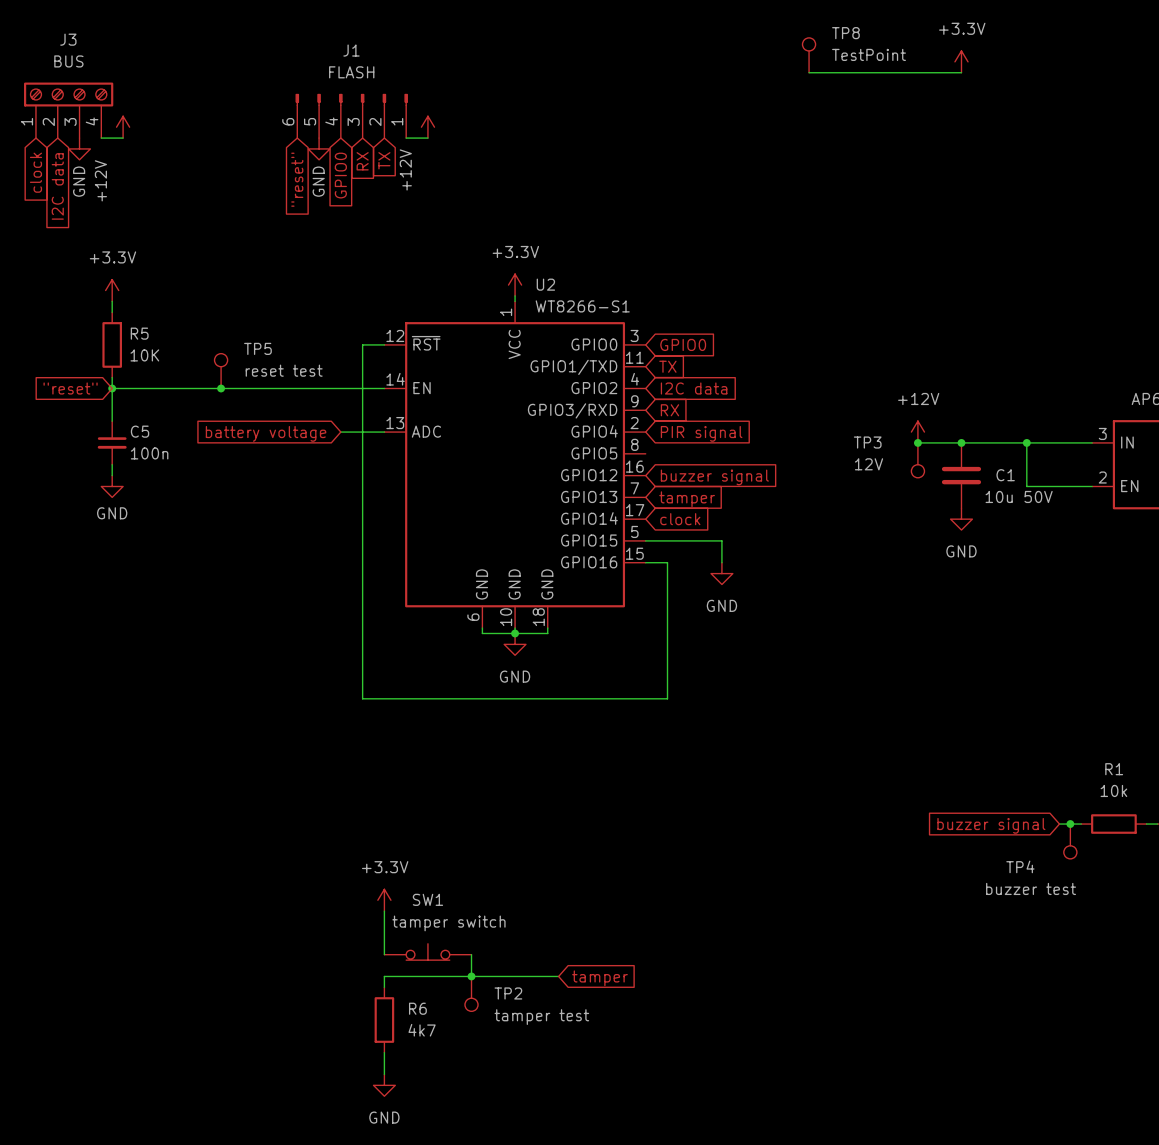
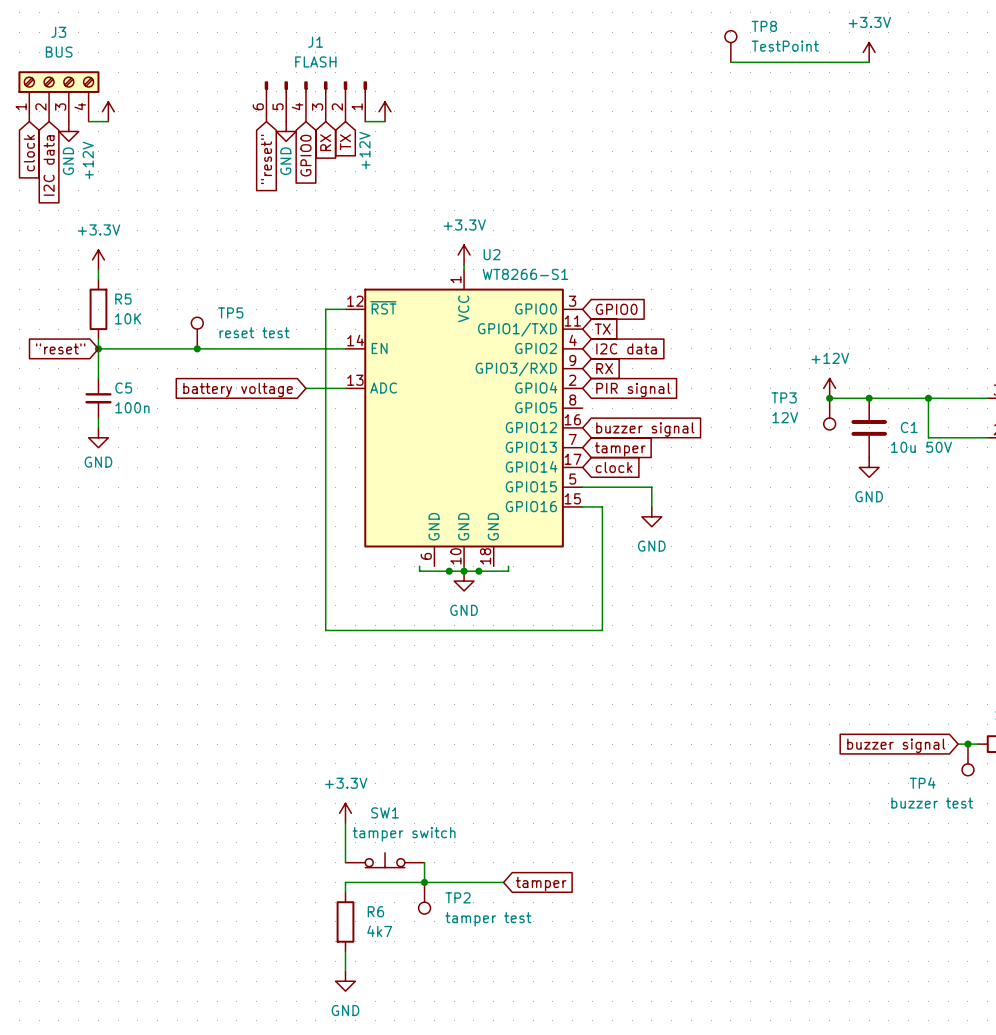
wire: (482, 628) (482, 633) -> (419, 566) (419, 571) (434, 571)
wire: (547, 628) (547, 633) -> (508, 566) (508, 571) (493, 571)
junction: none -> (449, 571)
junction: none -> (478, 571)

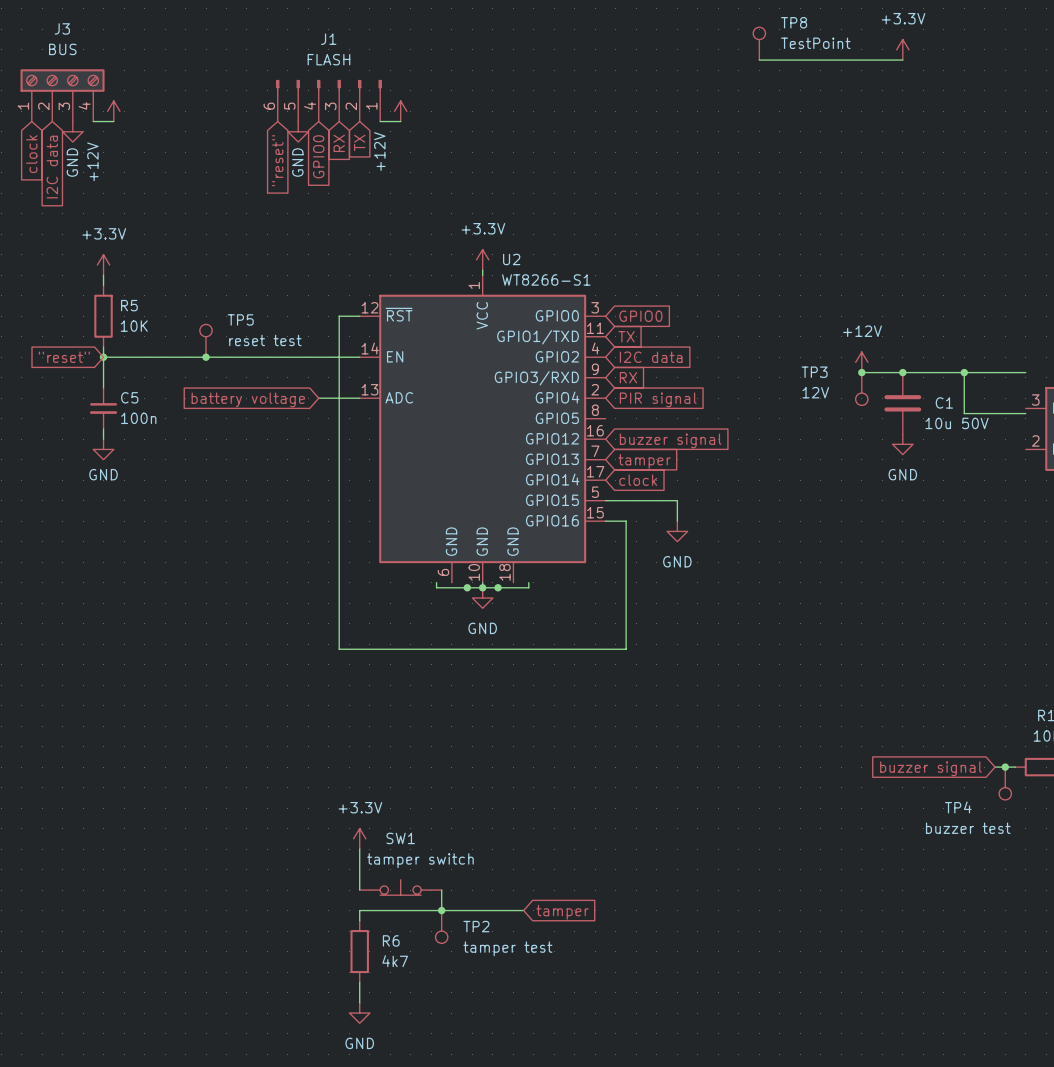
junction: none -> (861, 372)
junction: none -> (902, 372)
wire: none -> (964, 372) (964, 408)
junction: none -> (964, 372)
power symbol position: +12V (829, 388) -> +12V (861, 362)
wire: (829, 398) (987, 398) -> (861, 372) (1025, 372)
junction: (829, 398) -> none
junction: (869, 398) -> none
junction: (928, 398) -> none
wire: (928, 403) (928, 437) (987, 437) -> (964, 413) (1025, 413)
TP3 position: (829, 414) -> (861, 388)
C1 position: (869, 427) -> (902, 403)
power symbol position: GND (869, 467) -> GND (902, 444)

